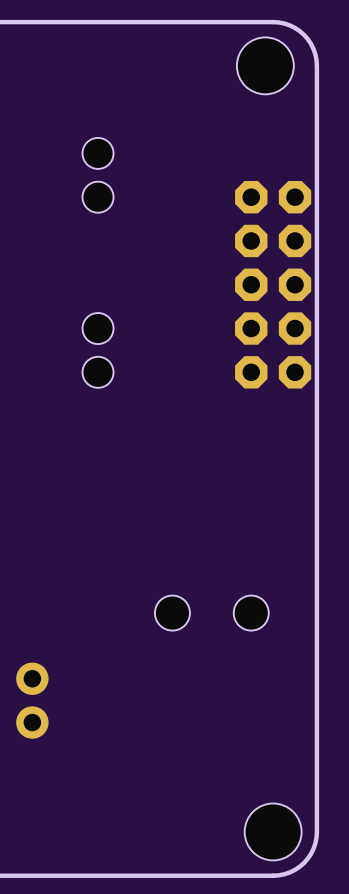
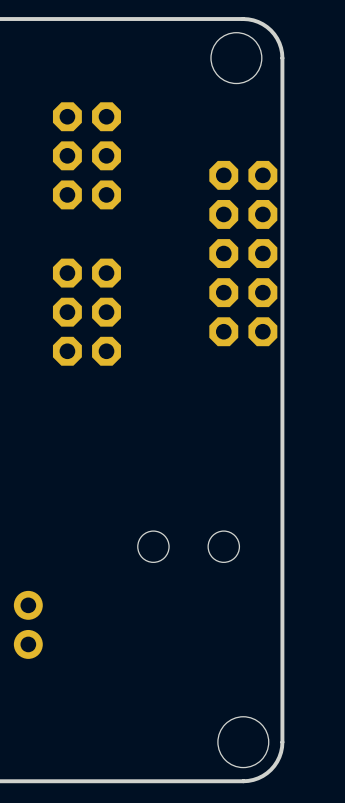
part footprint: [82, 137, 114, 213] -> [52, 102, 121, 210]
part footprint: [82, 313, 114, 388] -> [52, 258, 121, 366]

